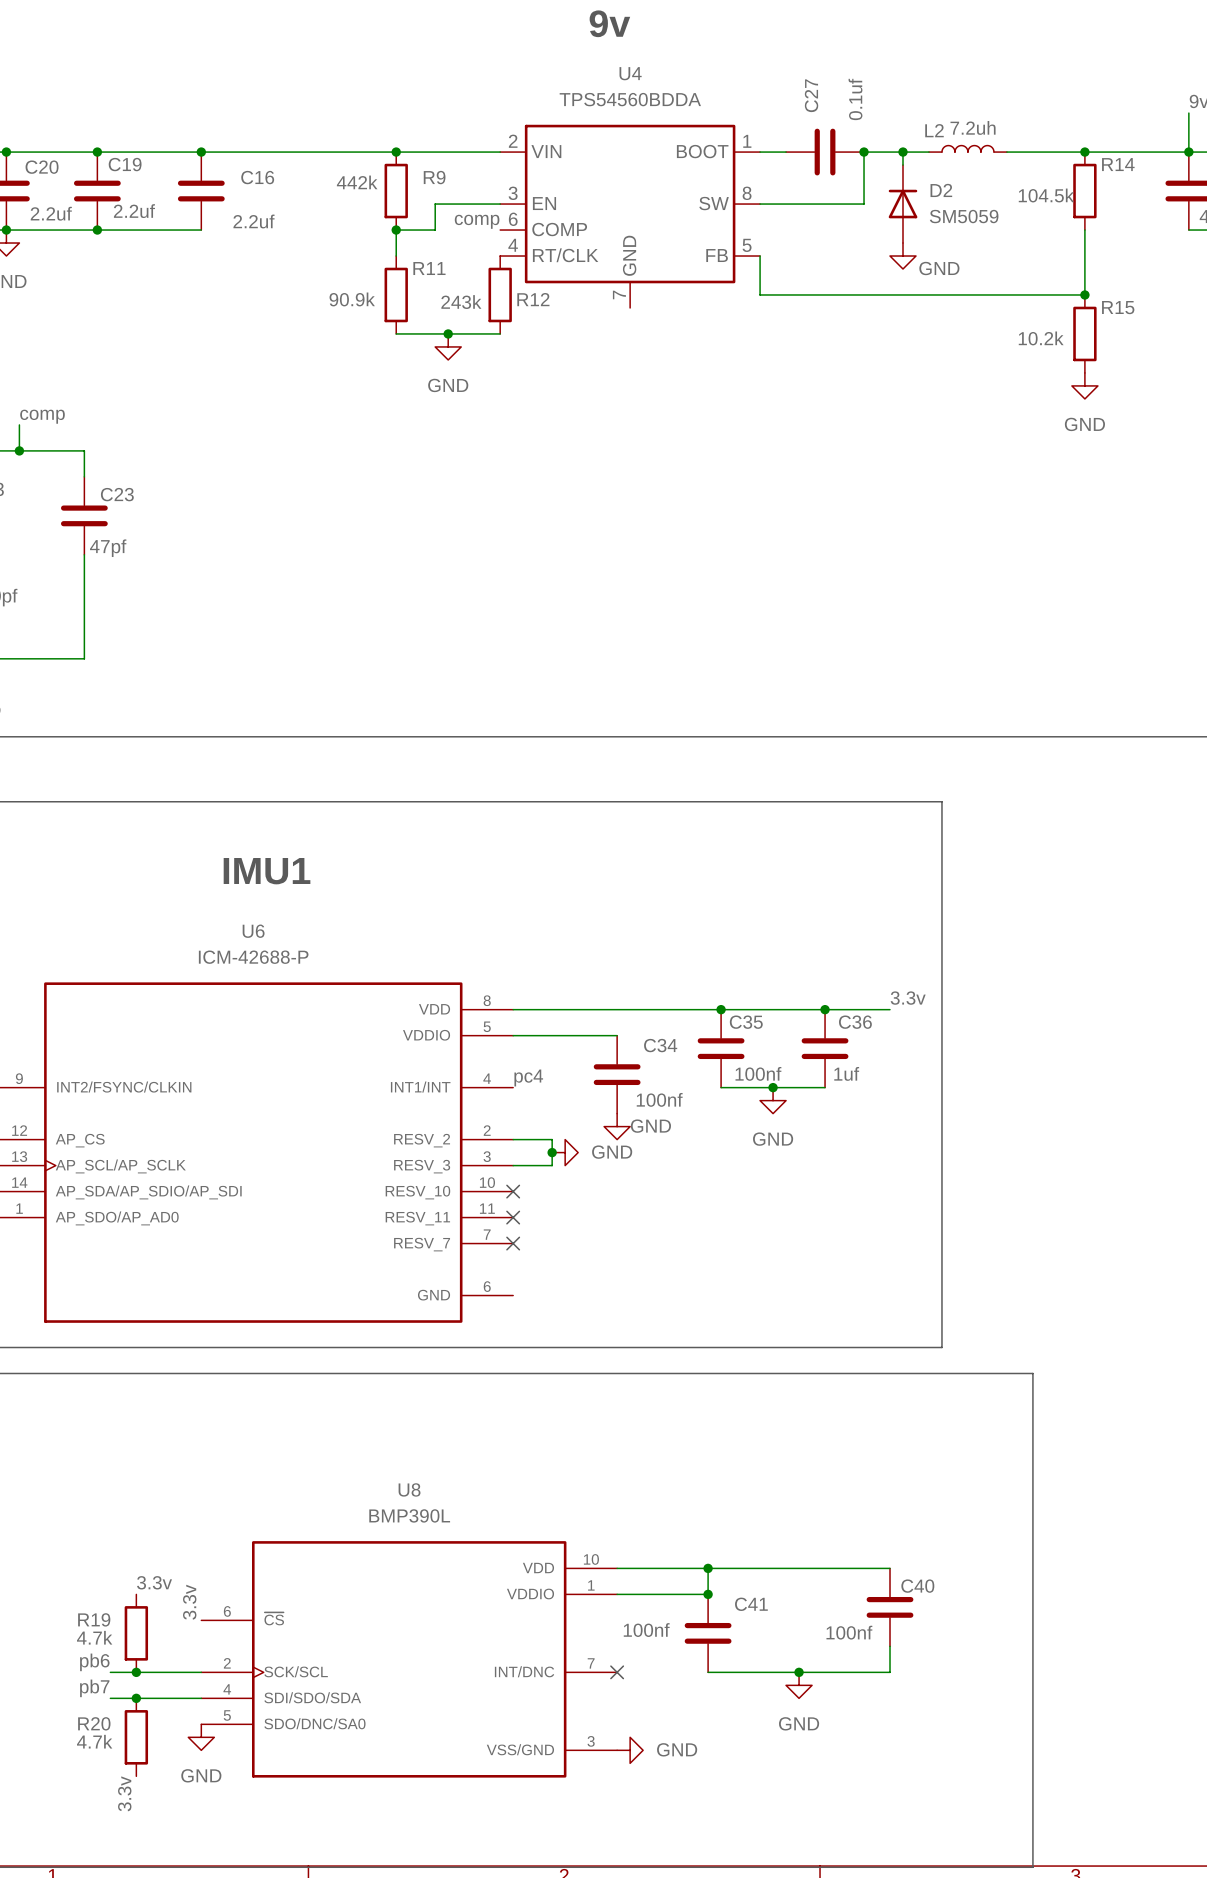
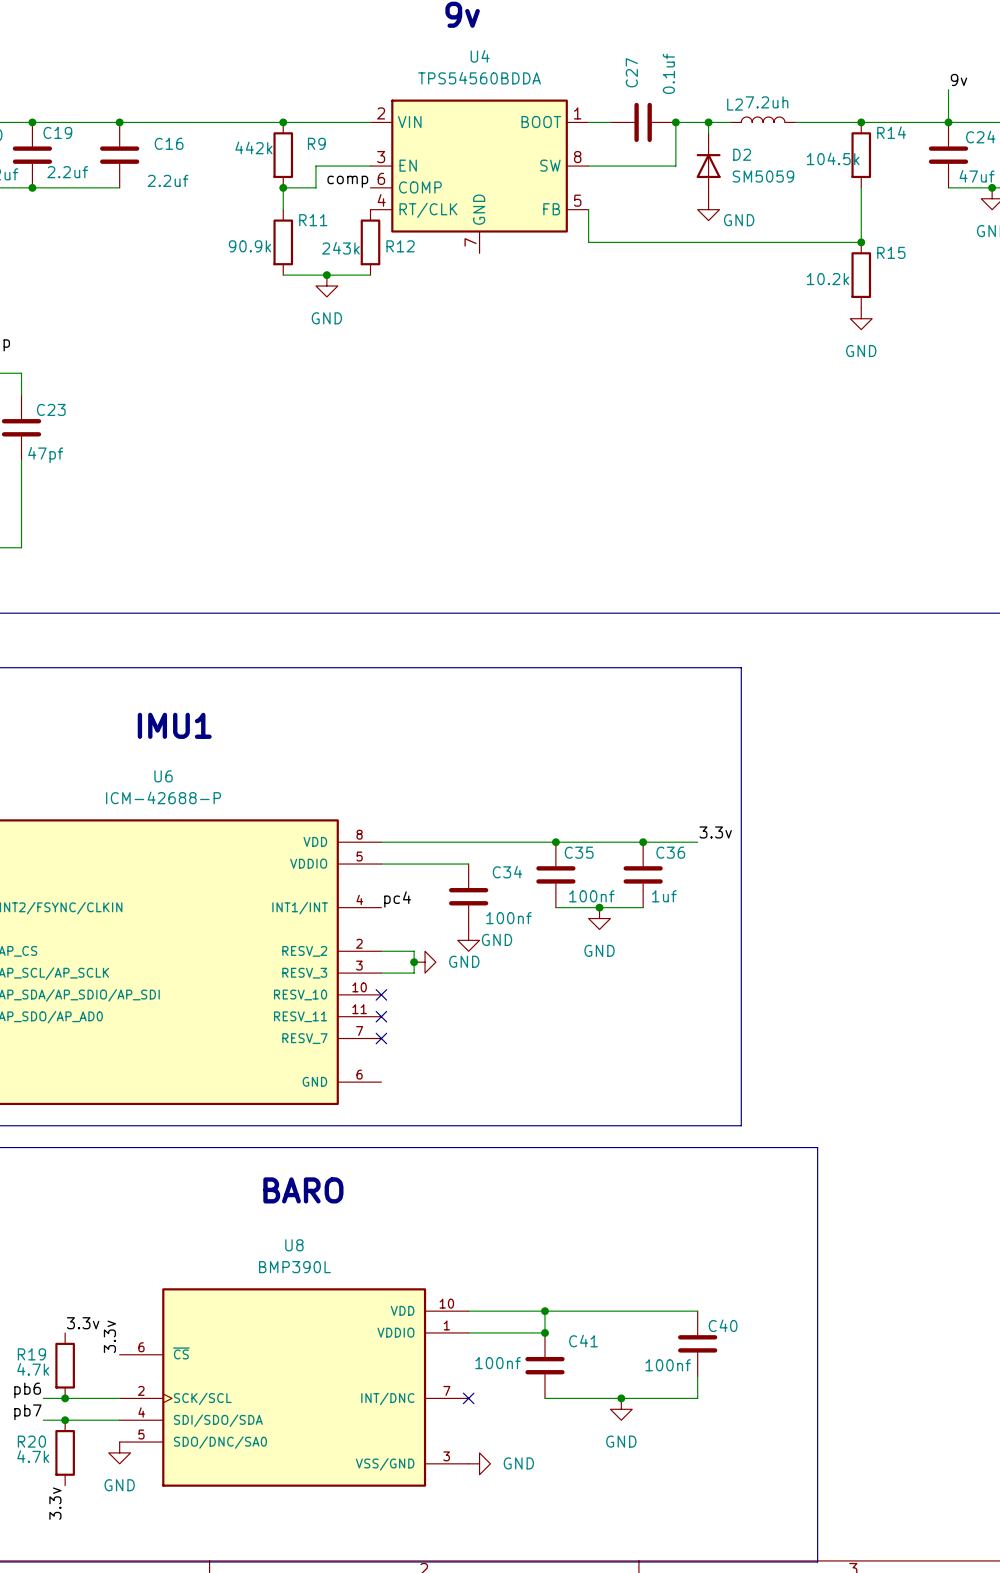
text: none -> BARO (303, 1190)

